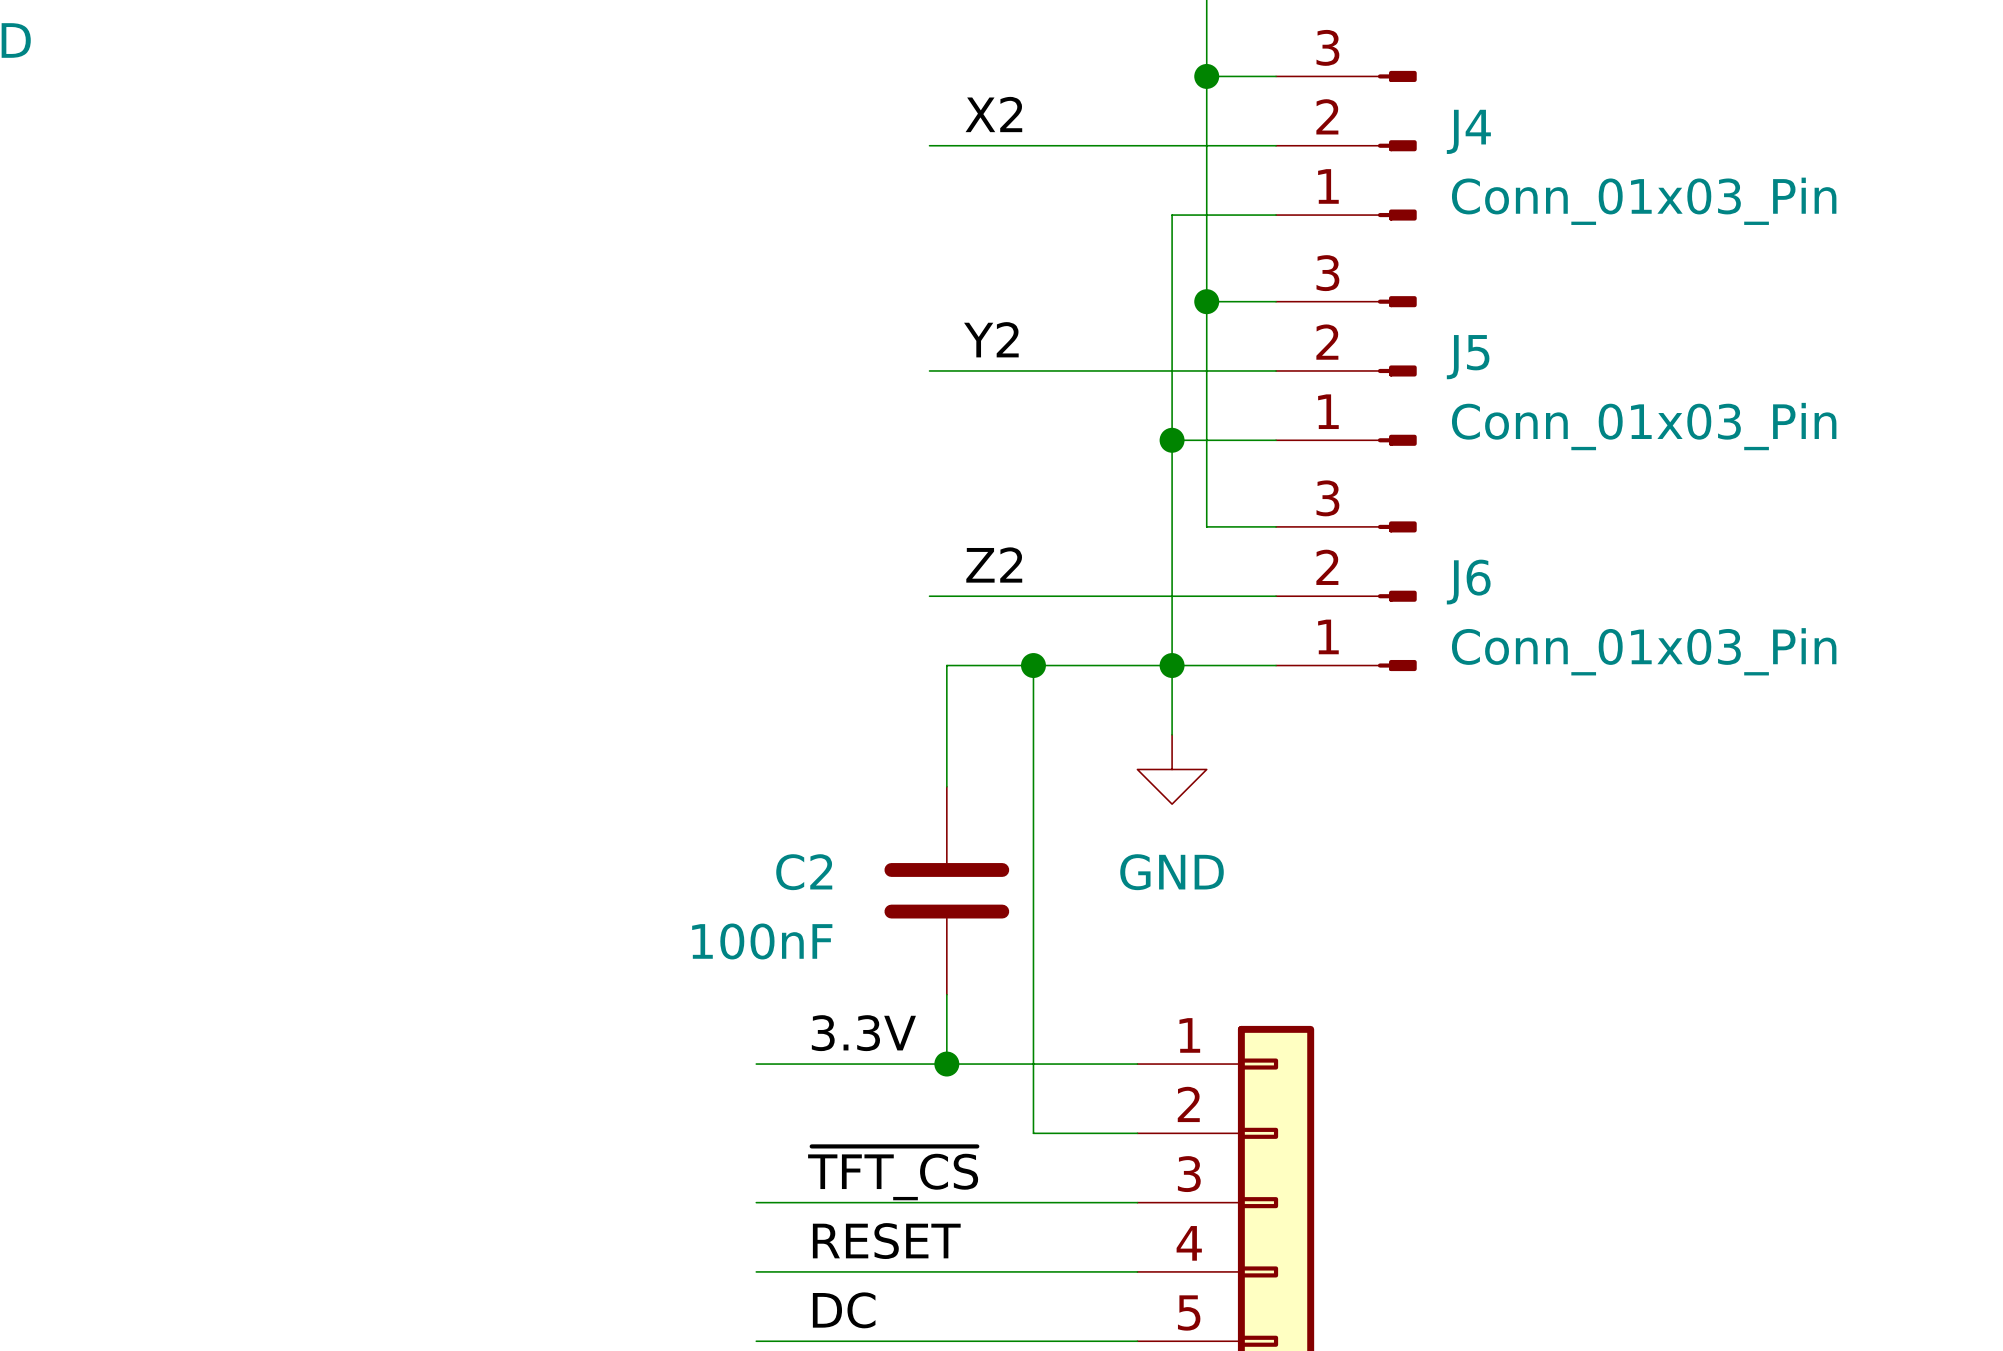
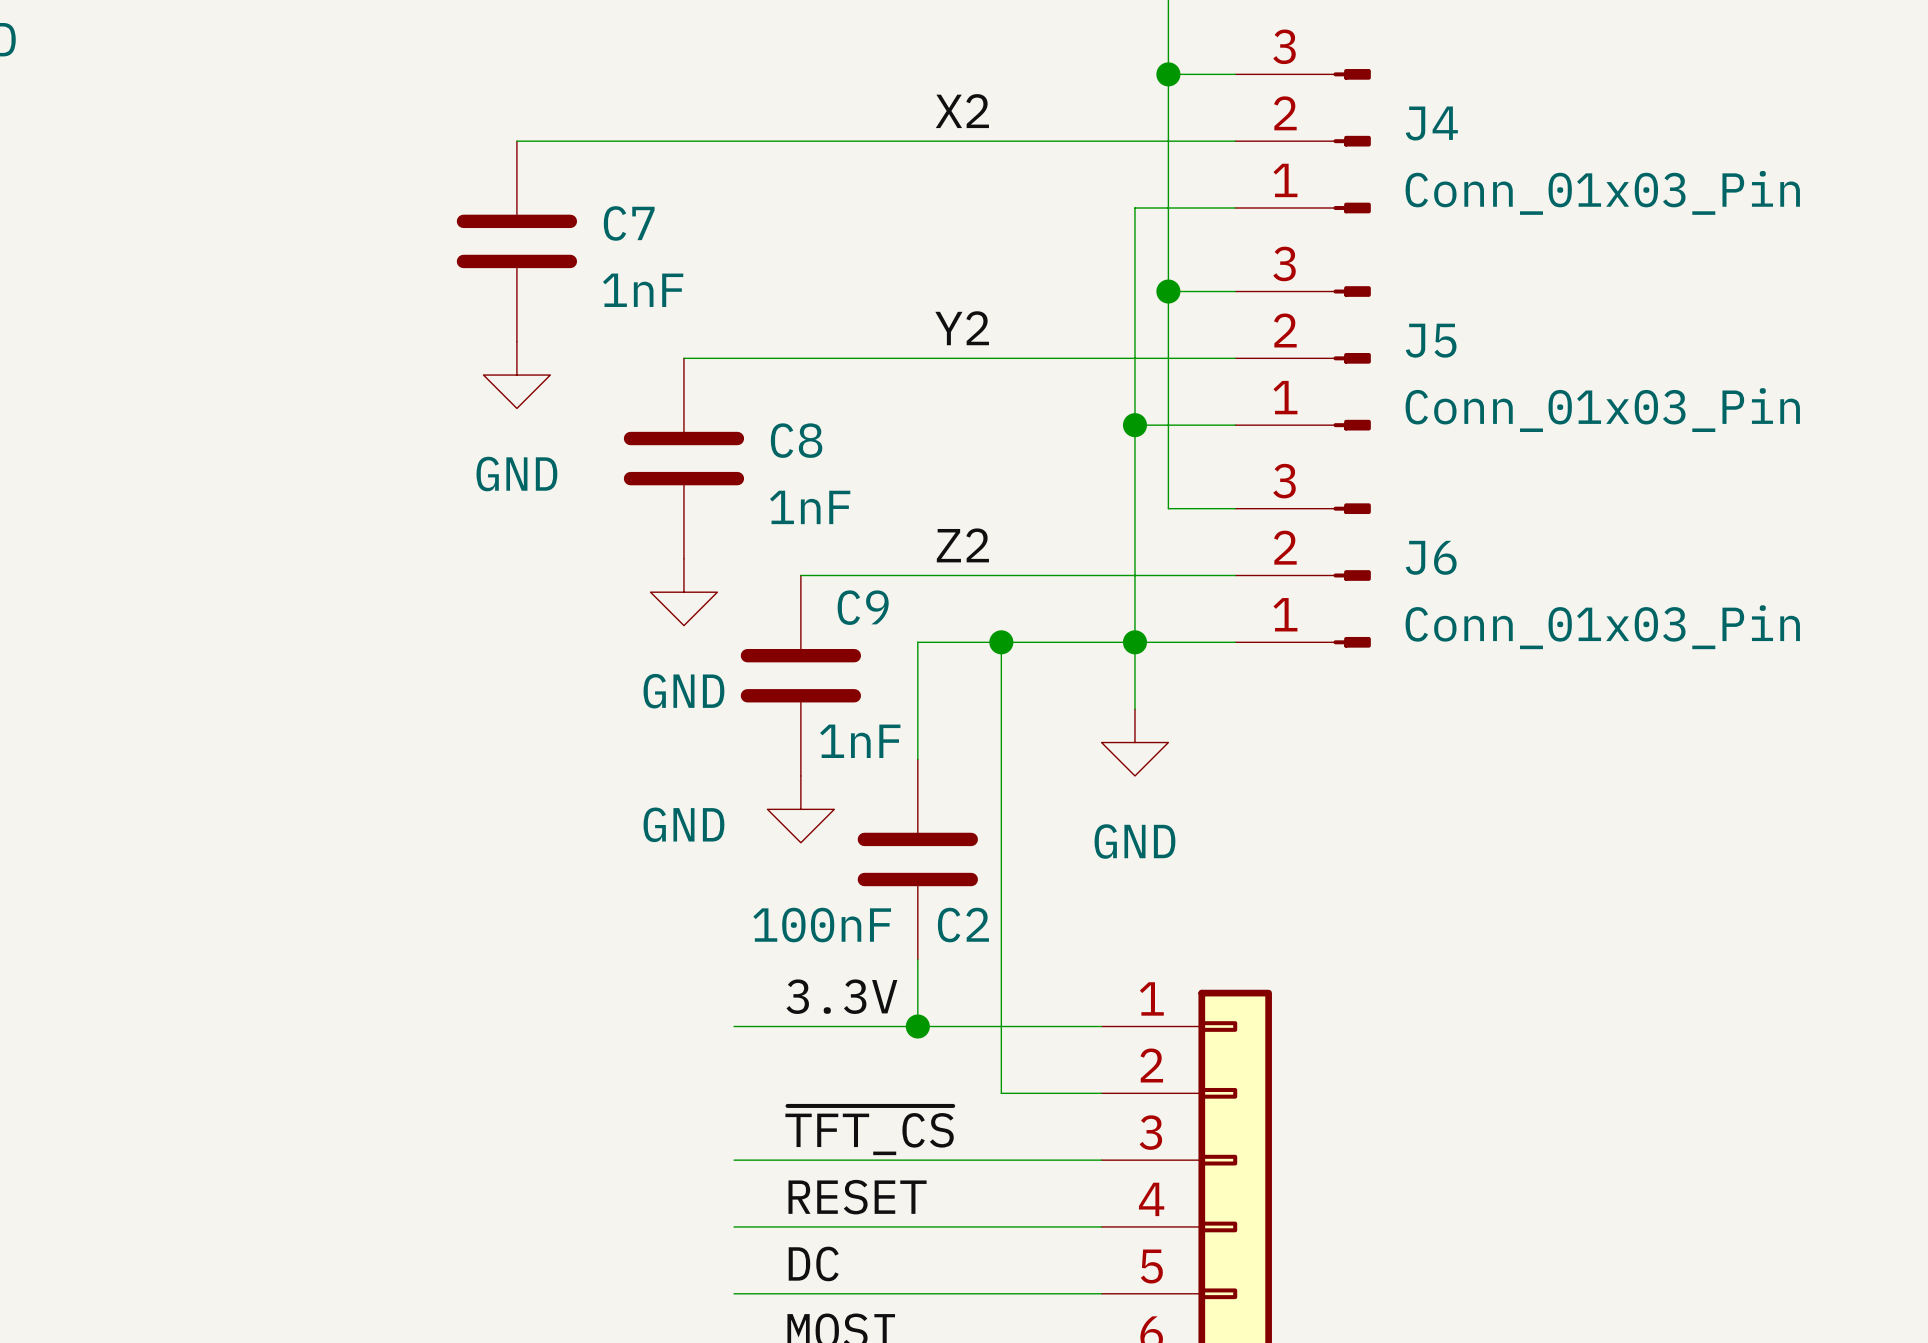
wire: none -> (516, 141) (901, 141)
C7: none -> 1nF (516, 241)
wire: none -> (683, 358) (901, 358)
power symbol: none -> GND (516, 375)
C8: none -> 1nF (683, 458)
wire: none -> (800, 575) (901, 575)
power symbol: none -> GND (683, 592)
C9: none -> 1nF (800, 675)
power symbol: none -> GND (800, 809)
C2 name position: C2 (804, 872) -> C2 (963, 925)
C2 value position: 100nF (762, 941) -> 100nF (822, 925)

